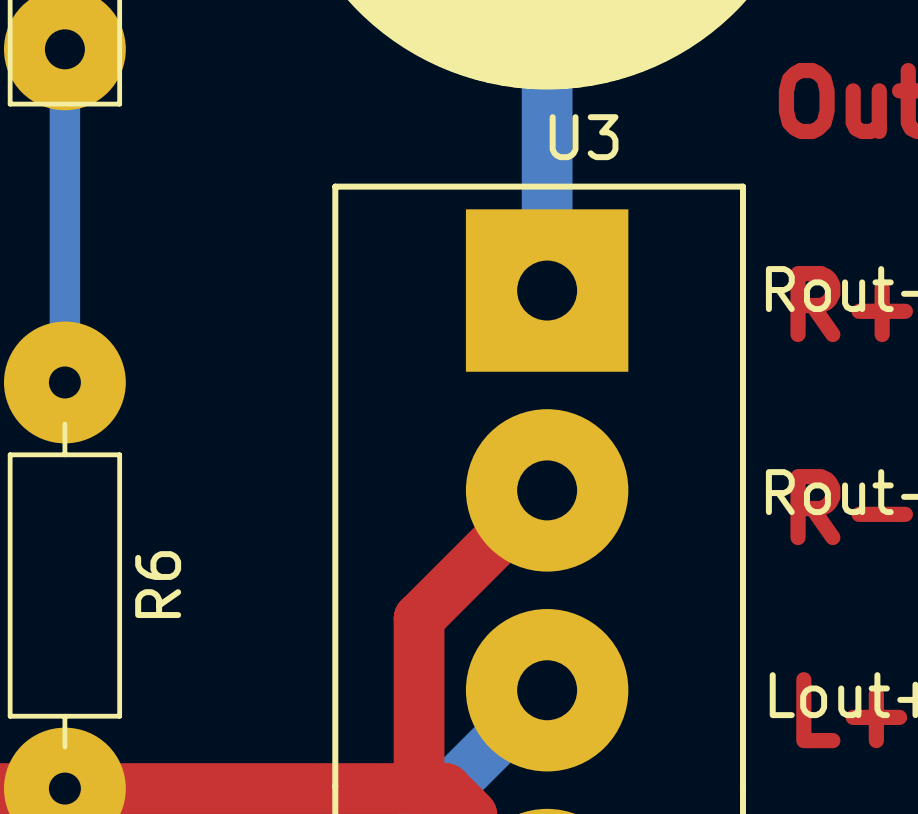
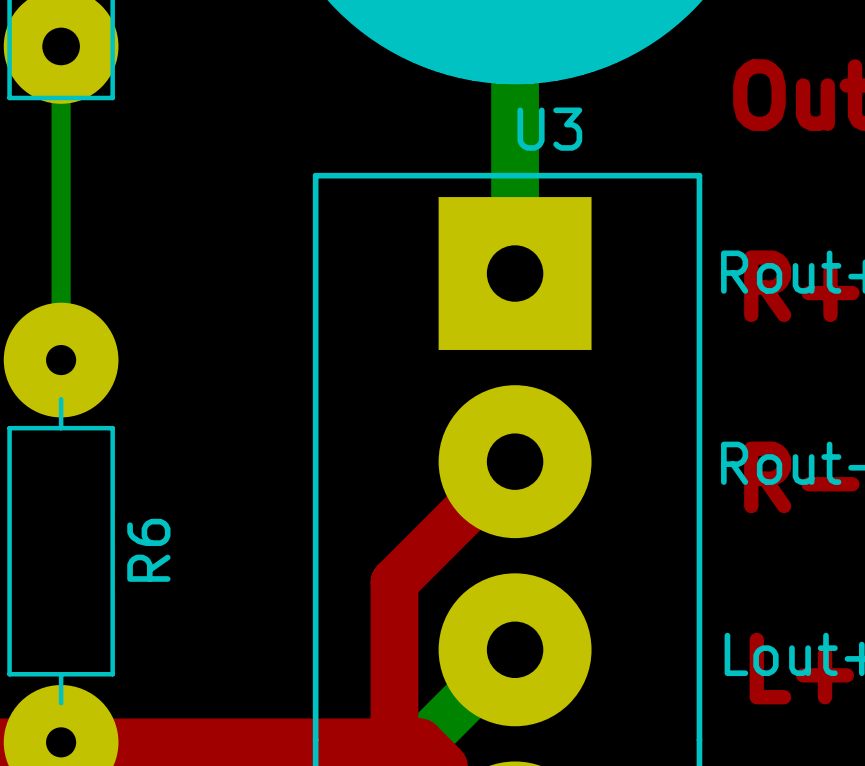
bottom track width: thick (64, 49) (64, 382) -> thin (61, 46) (61, 360)

